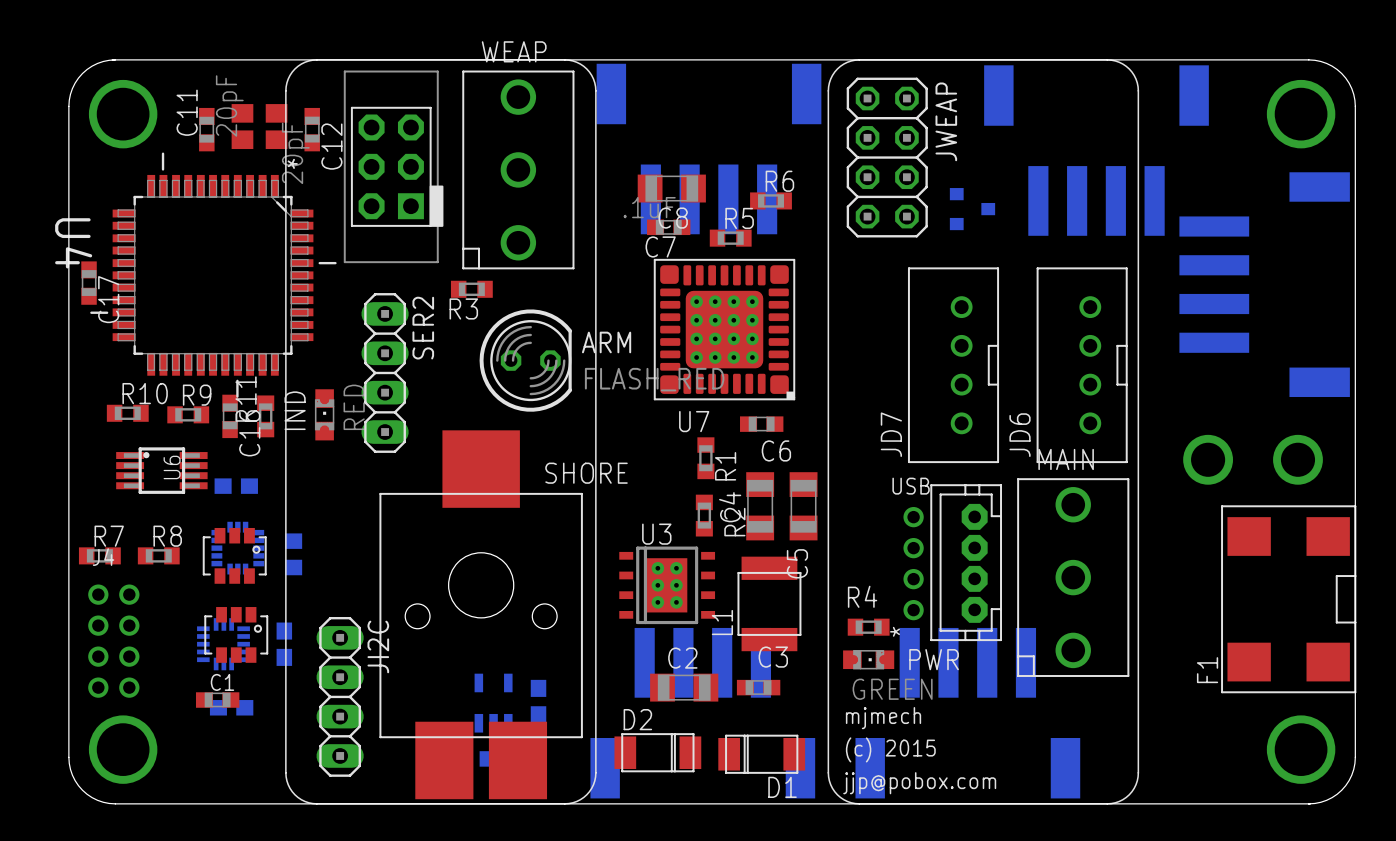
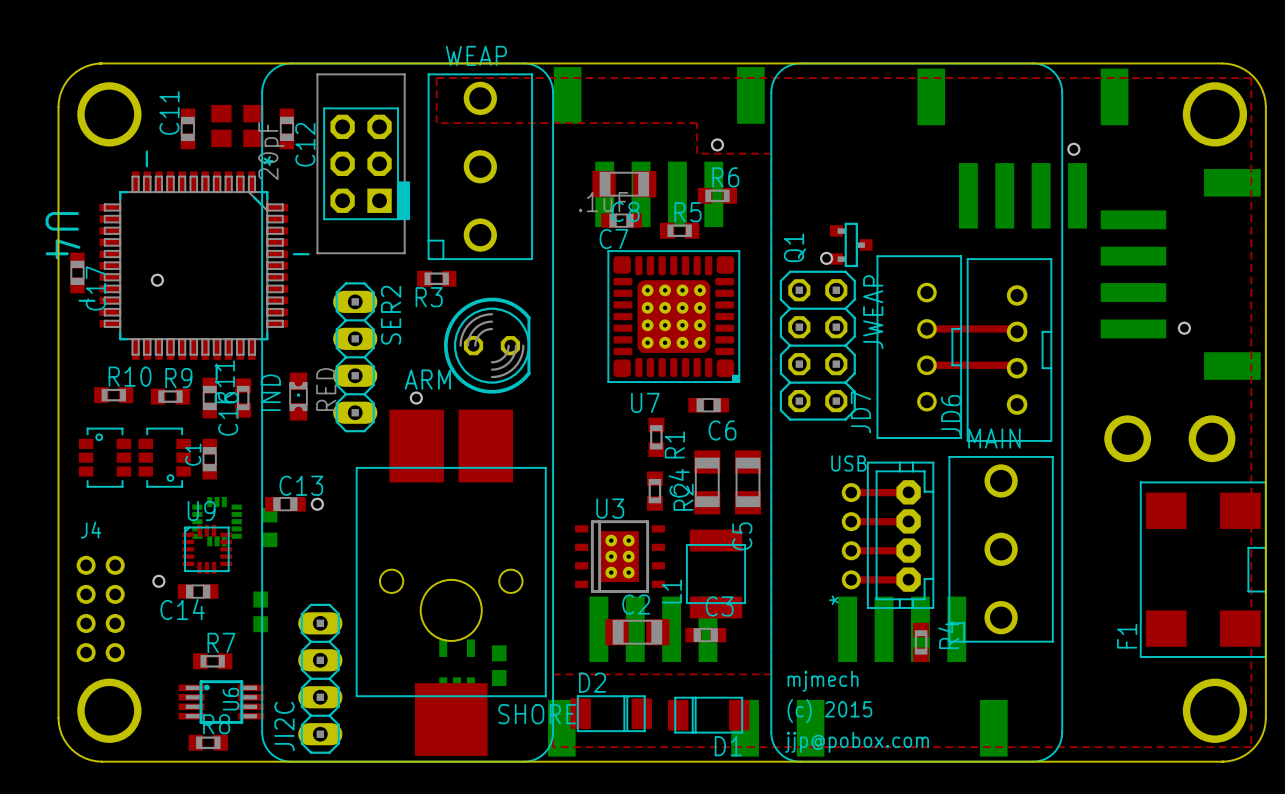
top zone outline: none -> (436, 78) (1251, 78) (1251, 747) (553, 747) (553, 674) (771, 674) (771, 153) (697, 153) (697, 123) (436, 123) (436, 78)
C11 value: 20pF (229, 105) -> none
via: none -> (717, 144)
via: none -> (1073, 149)
JWEAP position: (887, 157) -> (817, 345)
Q1 side: bottom (972, 209) -> top (851, 244)
via: none -> (826, 258)
JD7 footprint: [907, 267, 1000, 464] -> [876, 255, 963, 439]
via: none -> (157, 280)
via: none -> (1184, 328)
ARM name position: ARM (606, 342) -> ARM (427, 379)
top track: none -> (926, 328) (1018, 328)
ARM value: FLASH_RED (654, 379) -> none
top track: none -> (926, 365) (1018, 365)
via: none -> (416, 398)
U6 position: (161, 470) -> (221, 702)
SHORE name position: SHORE (586, 473) -> SHORE (537, 714)
part: none -> (105, 457)
part: none -> (164, 457)
C13 side: bottom (236, 486) -> top (285, 504)
top track: none -> (851, 492) (909, 492)
via: none -> (317, 504)
top track: none -> (851, 521) (909, 521)
R7 position: (99, 555) -> (212, 661)
R8 position: (158, 555) -> (208, 742)
part: (234, 555) -> none
top track: none -> (851, 550) (909, 550)
top track: none -> (851, 579) (909, 579)
via: none -> (158, 581)
SHORE rotation: 0° (481, 614) -> 180° (451, 582)
R4 rotation: 0° (868, 627) -> 90° clockwise (921, 642)
R4 position: (868, 627) -> (921, 642)
part: (236, 634) -> none
U9 side: bottom (223, 644) -> top (207, 549)
JI2C name position: JI2C (378, 646) -> JI2C (284, 726)
PWR: GREEN (868, 659) -> none
C2 position: (684, 687) -> (637, 632)
C3 position: (758, 687) -> (705, 635)
JI2C position: (340, 696) -> (320, 678)
C1 rotation: 0° (217, 700) -> 90° clockwise (209, 459)
C1 position: (217, 700) -> (209, 459)
C14 side: bottom (231, 707) -> top (198, 591)

